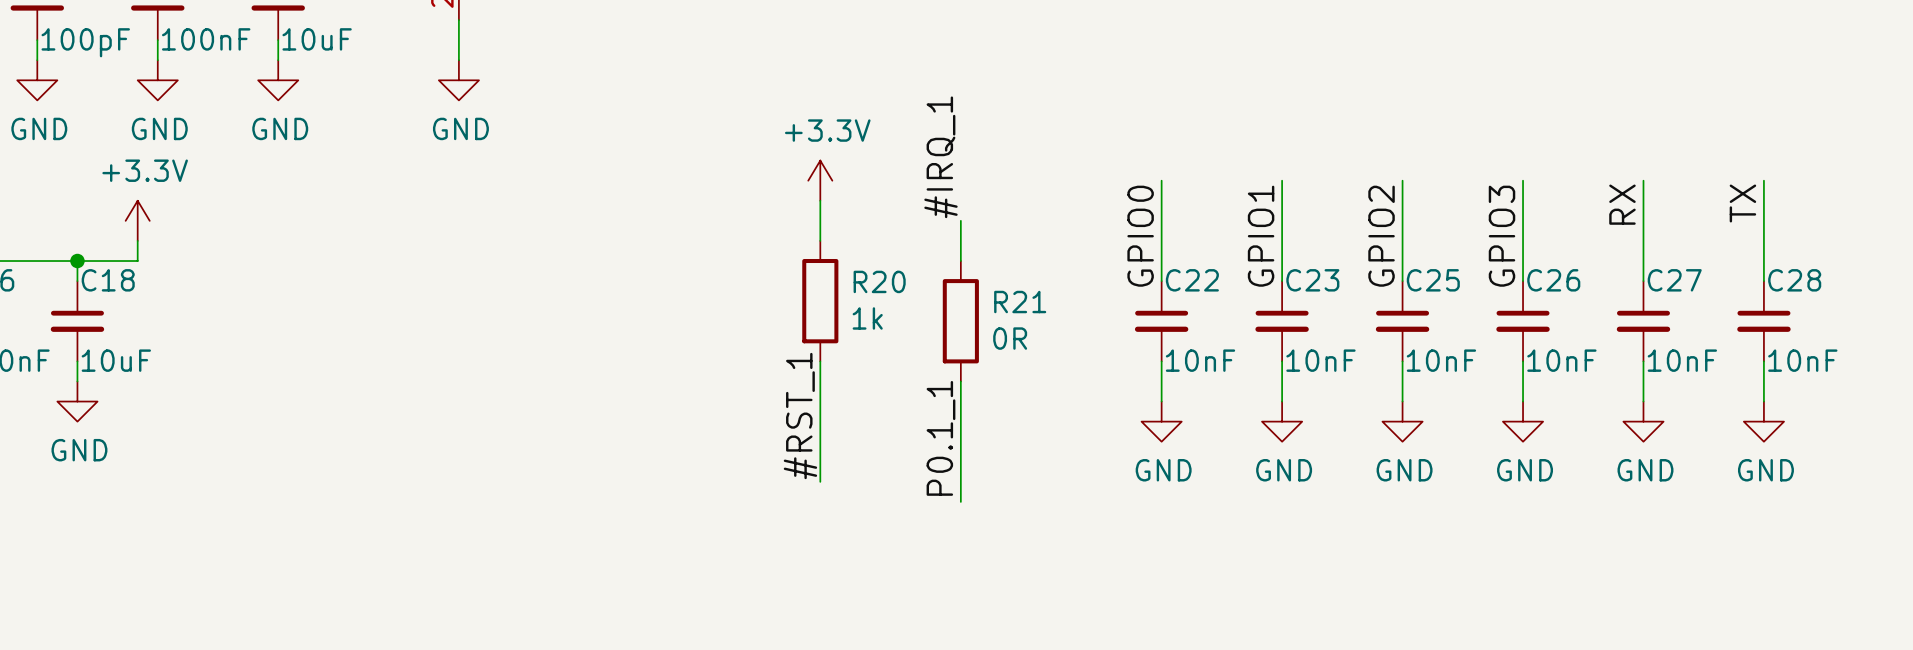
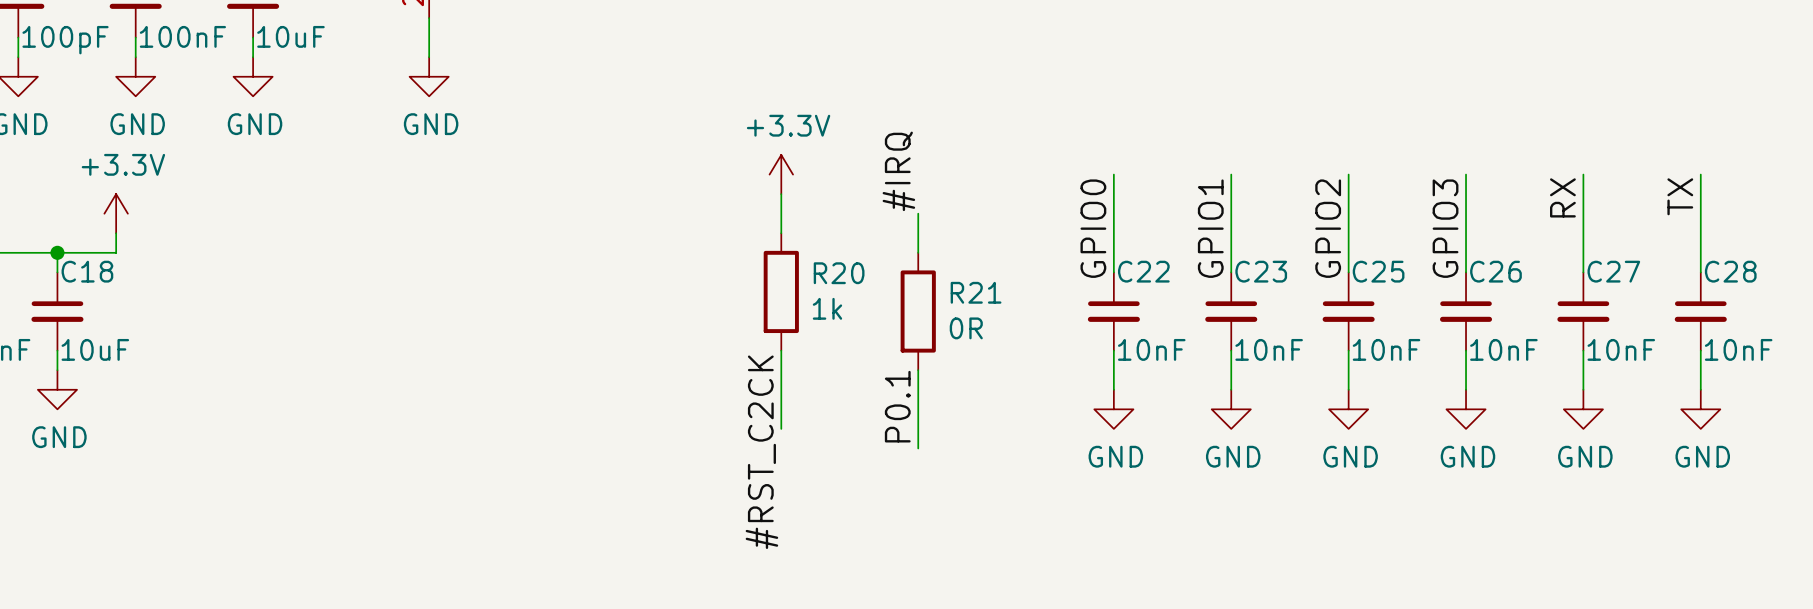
label: #IRQ_1 (940, 157) -> #IRQ (898, 171)
label: #RST_1 (800, 416) -> #RST_C2CK (761, 452)
label: P0.1_1 (940, 438) -> P0.1 (897, 406)
wire: (820, 441) (820, 481) -> none
wire: (960, 461) (960, 501) -> none

